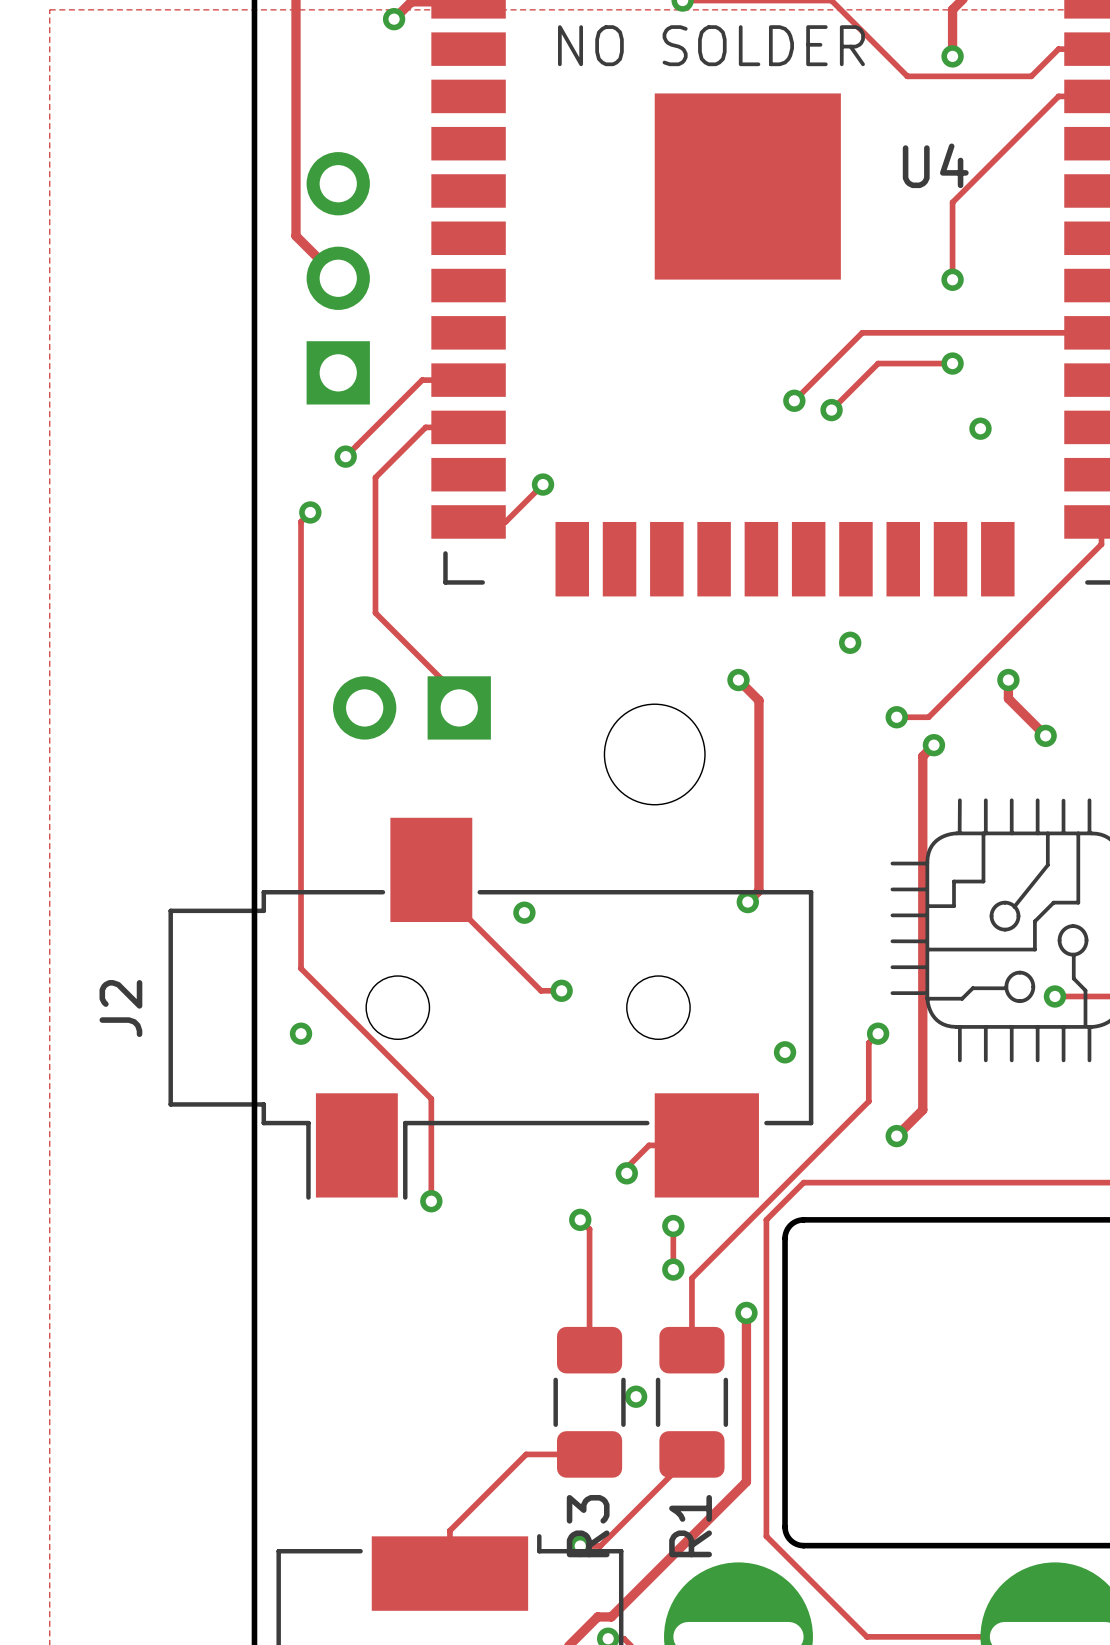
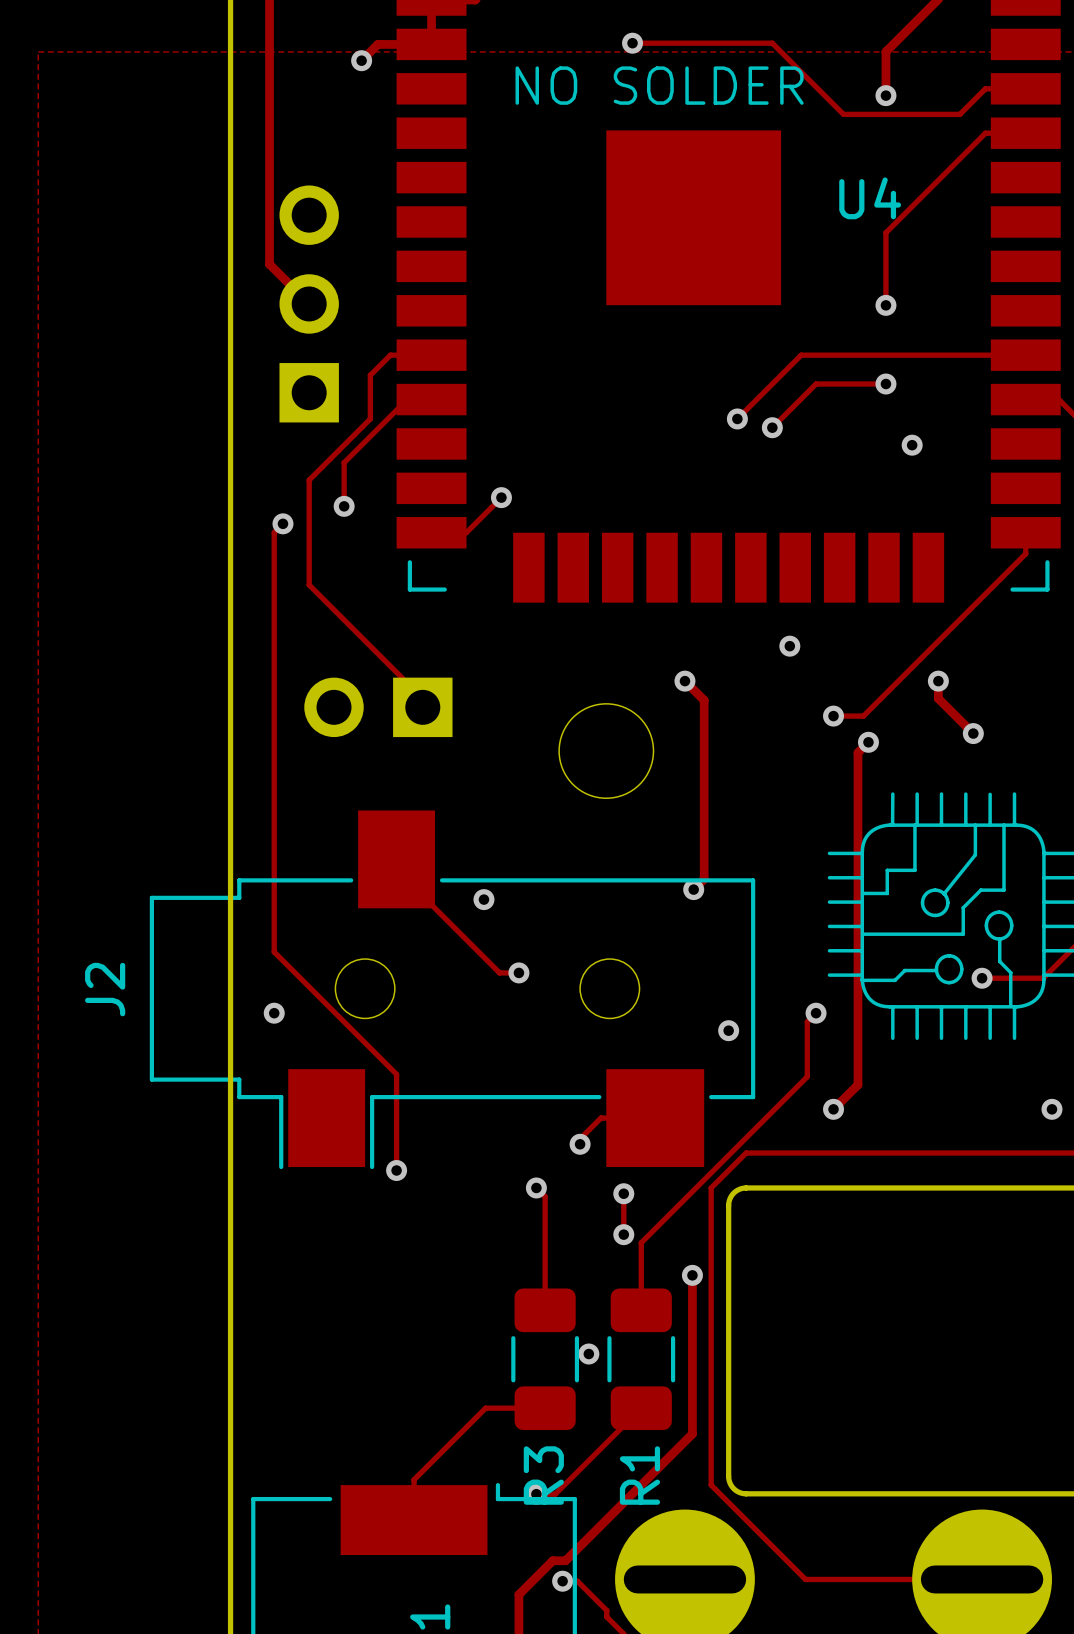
track: (442, 380) (422, 380) (345, 456) -> (407, 399) (344, 462) (344, 491)
track: (468, 427) (425, 427) (375, 477) -> none
via position: (345, 456) -> (344, 506)
track: (375, 493) (375, 613) (459, 698) -> (431, 355) (390, 355) (370, 375) (370, 418) (309, 480) (309, 585) (422, 698)

